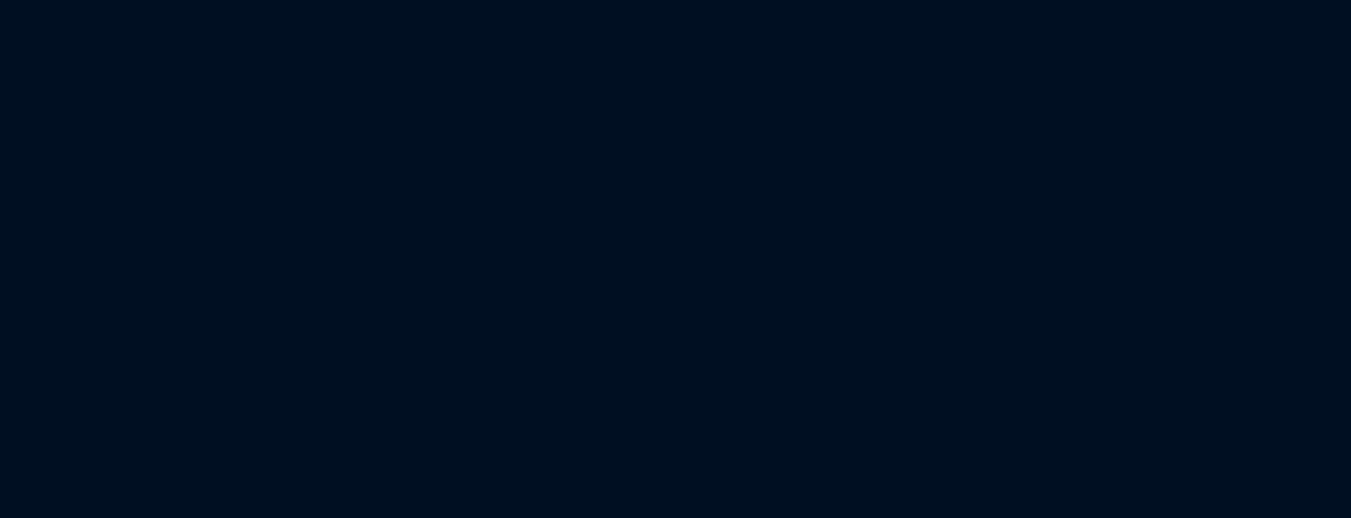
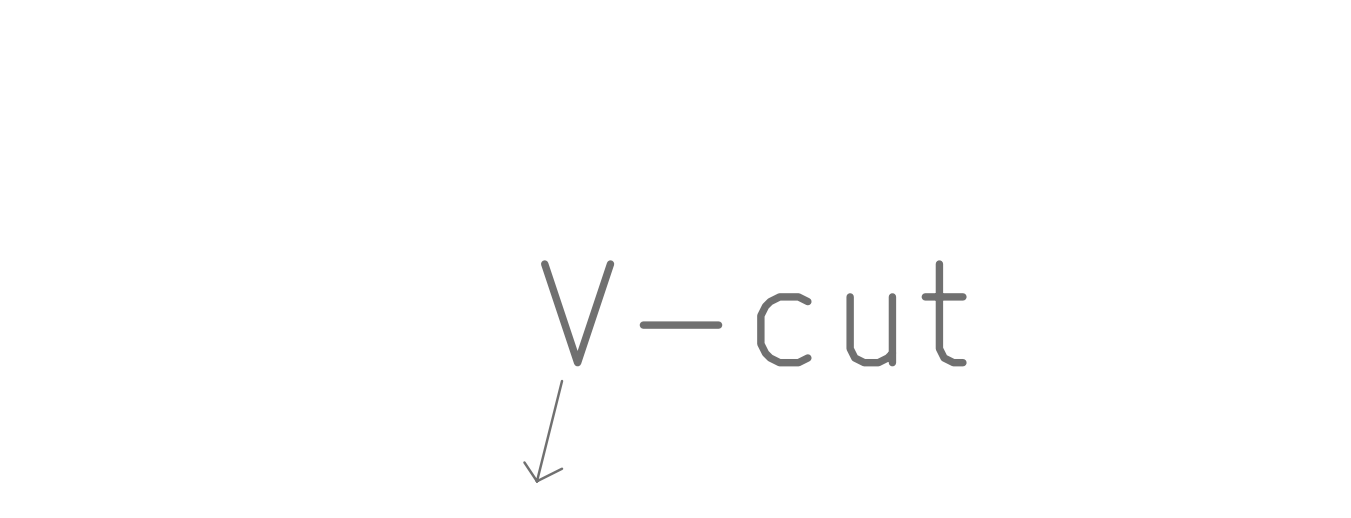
text: none -> V-cut (753, 313)
line: none -> (562, 381) (536, 481)
line: none -> (524, 462) (536, 481)
line: none -> (562, 468) (536, 481)

